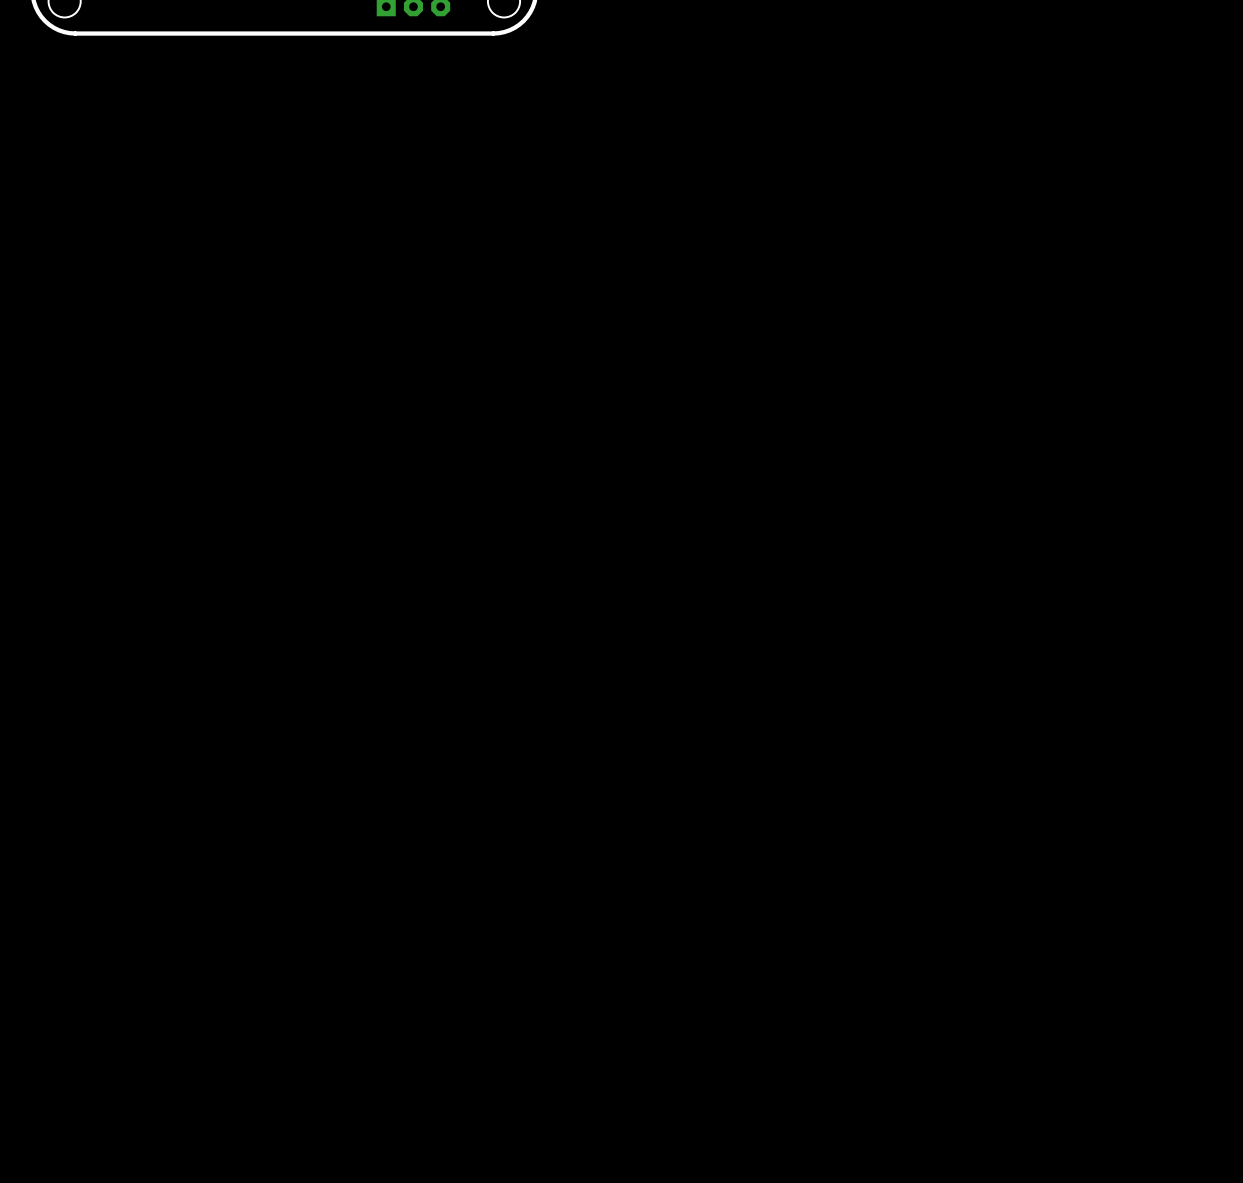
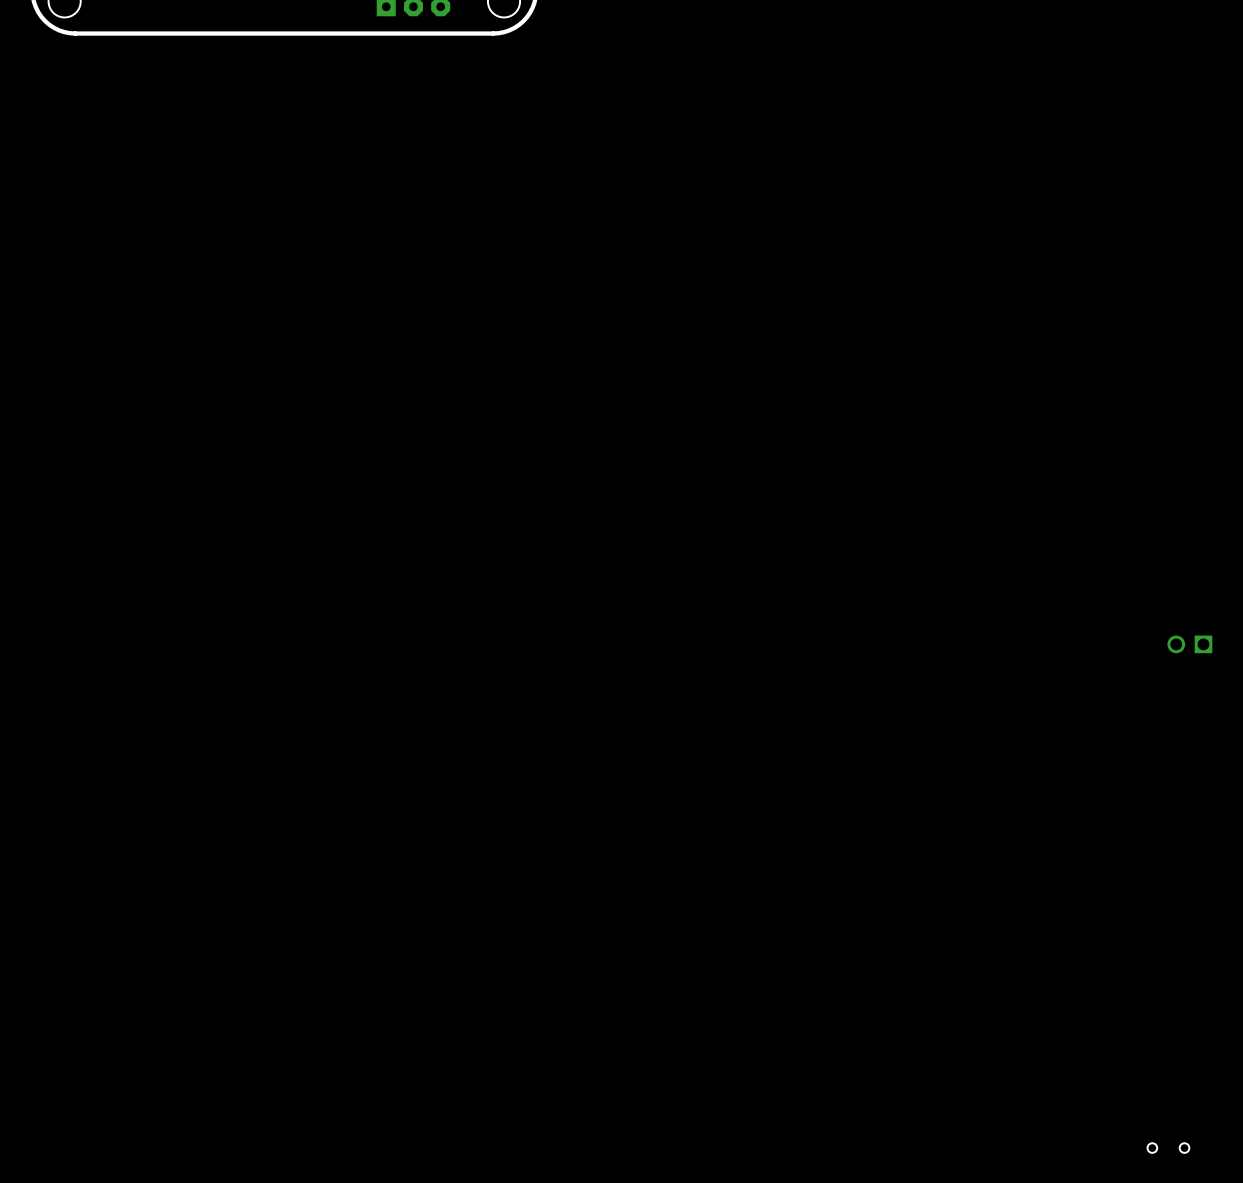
part: none -> (1189, 644)
part: none -> (1168, 1148)

